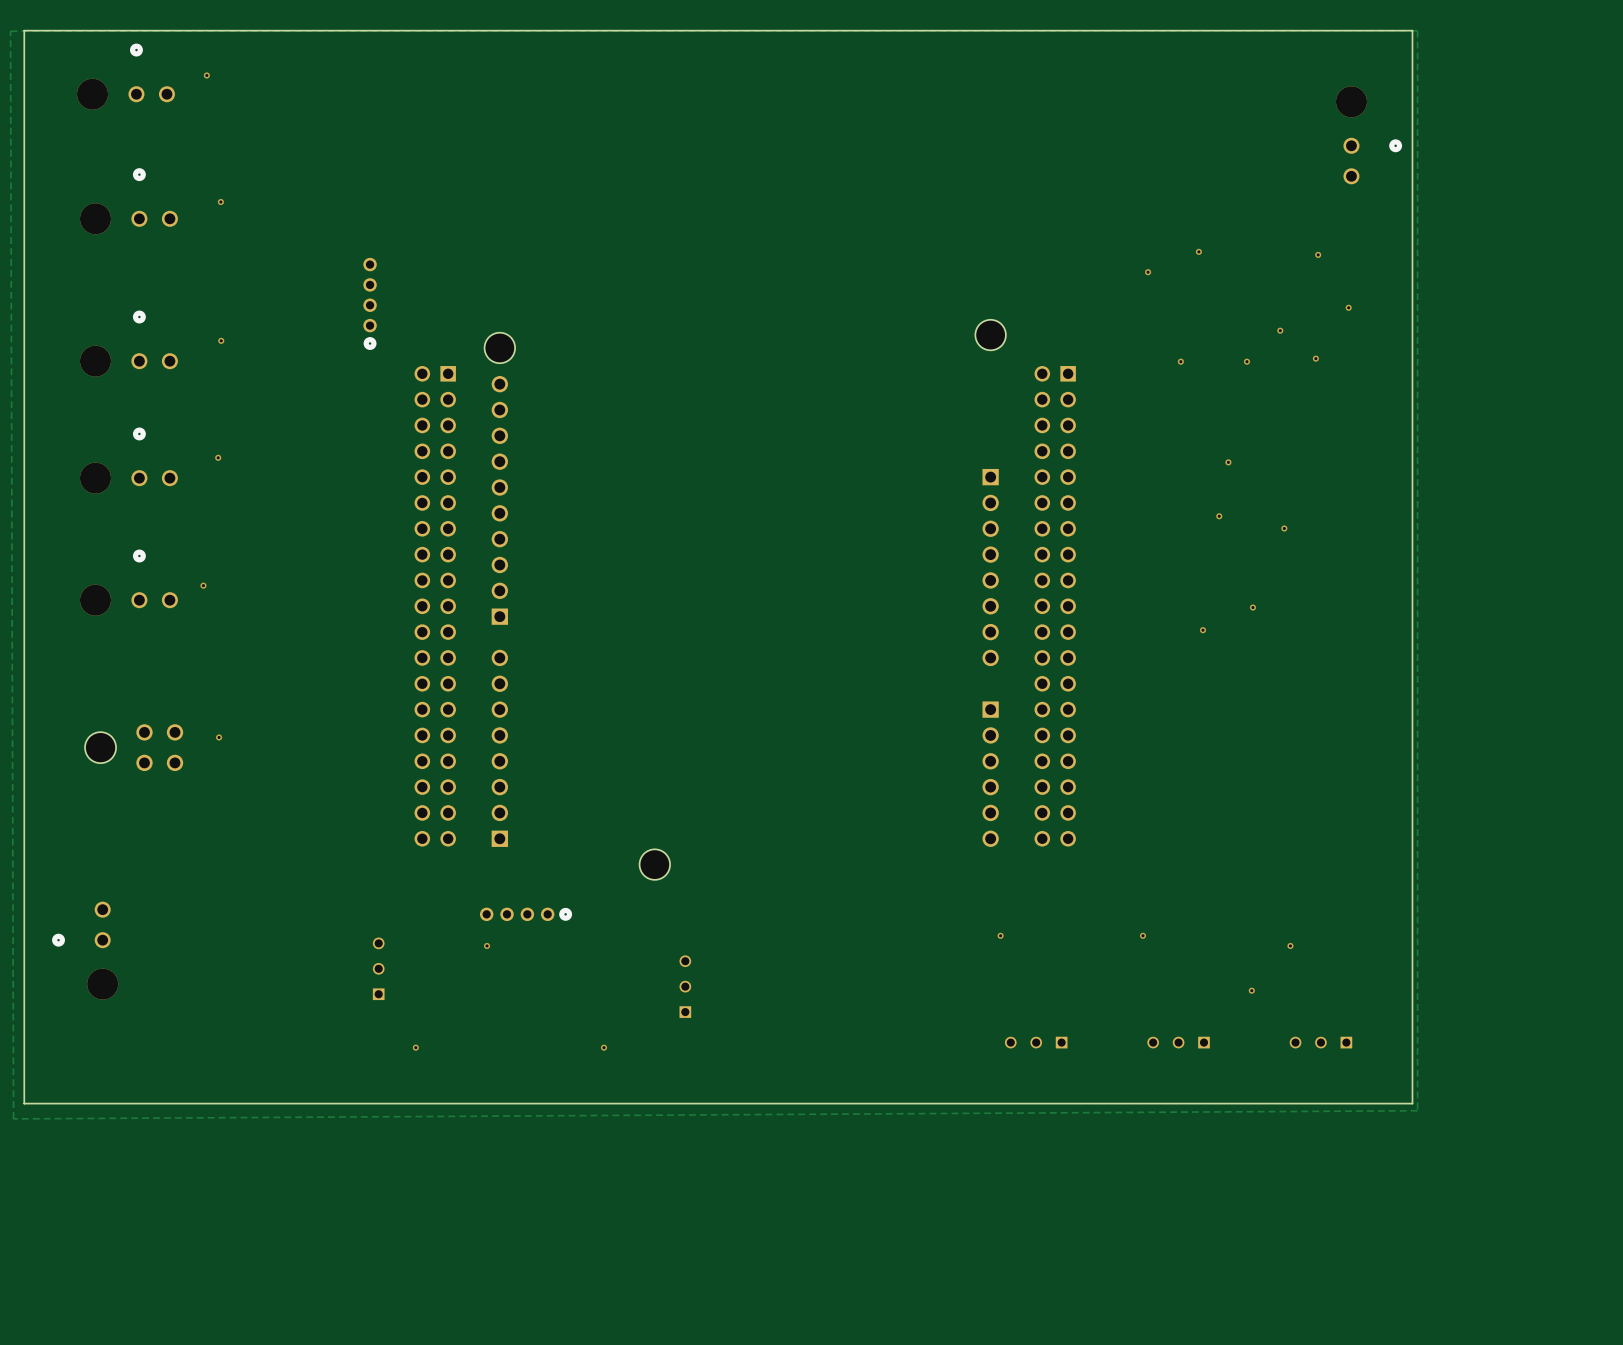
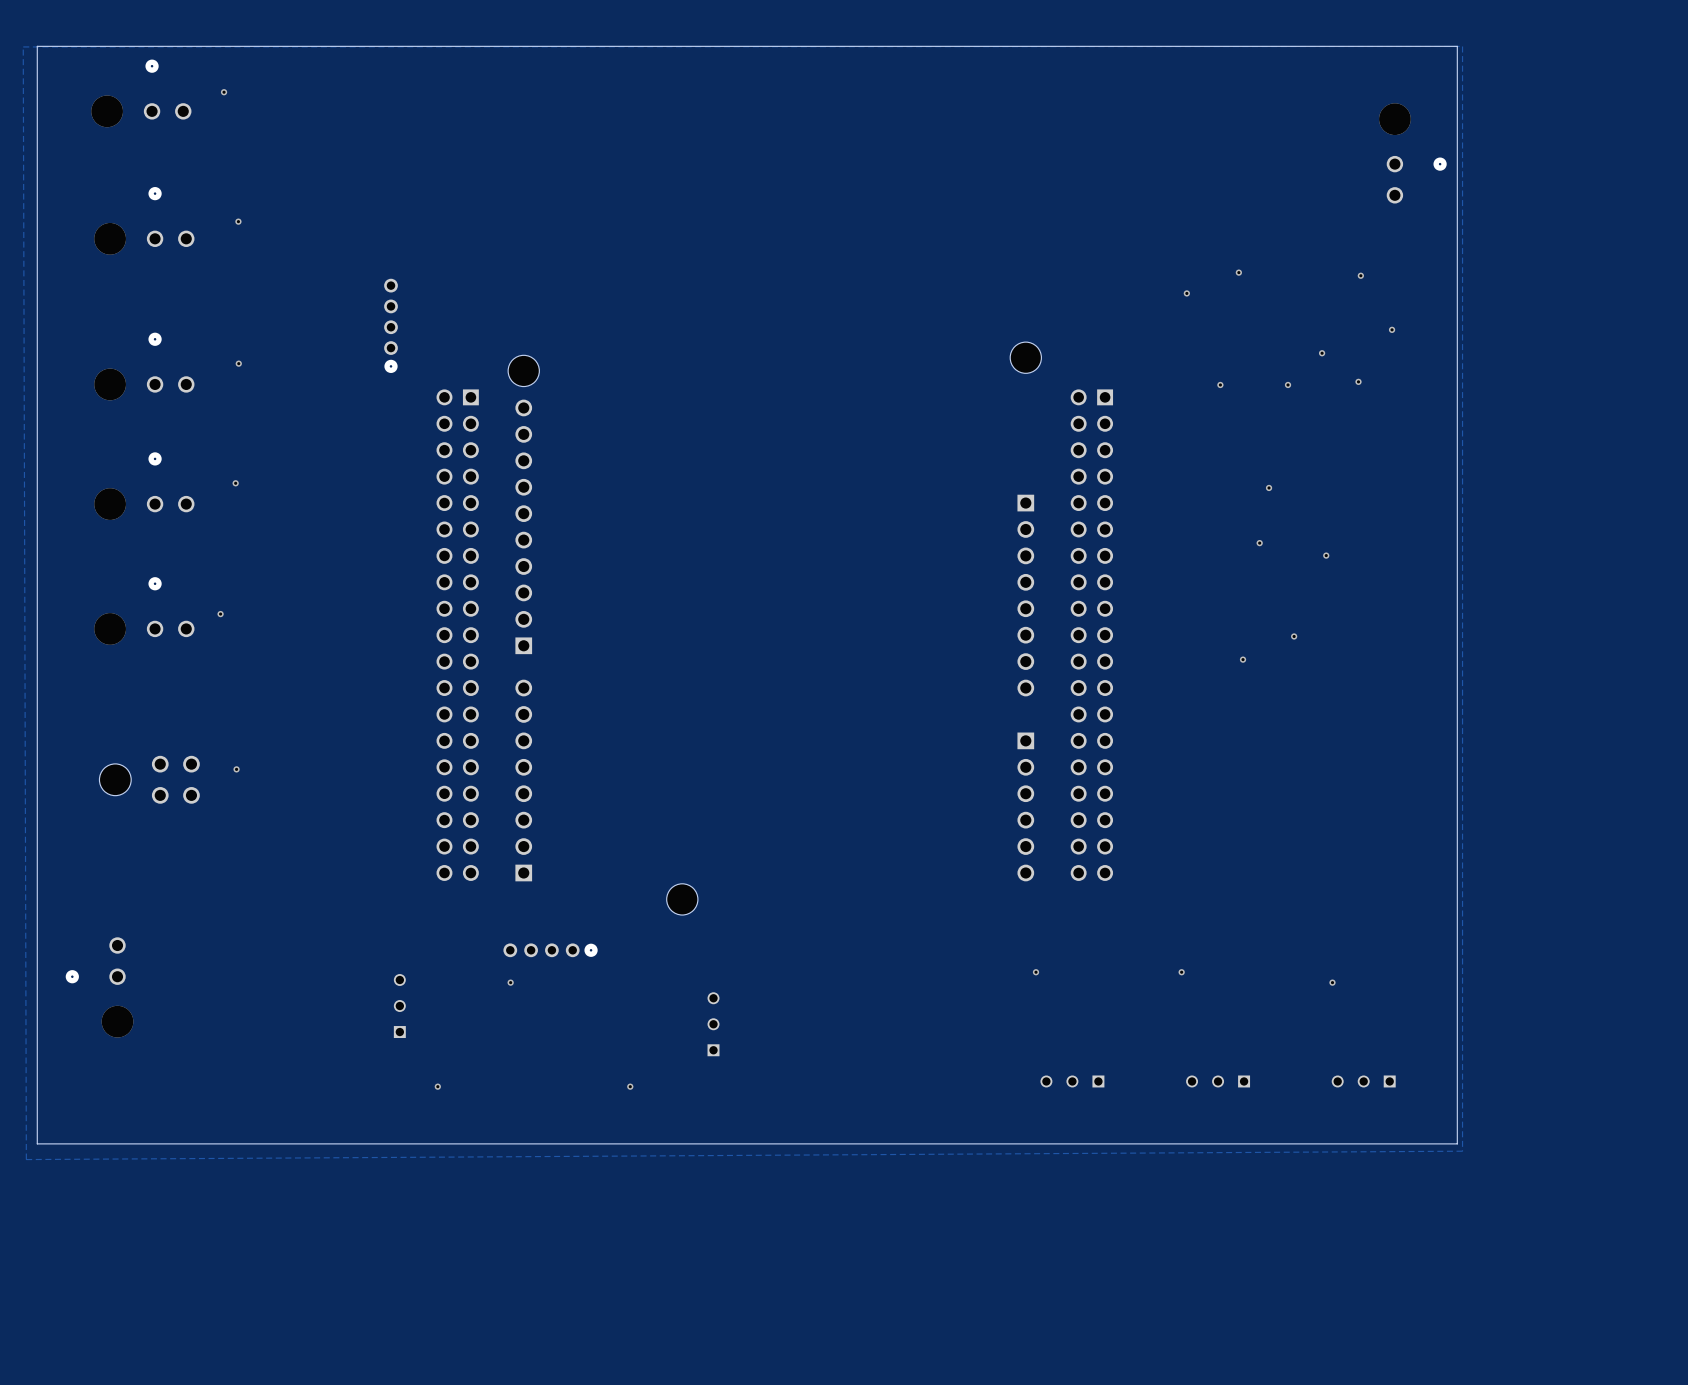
via: (1251, 990) -> none

